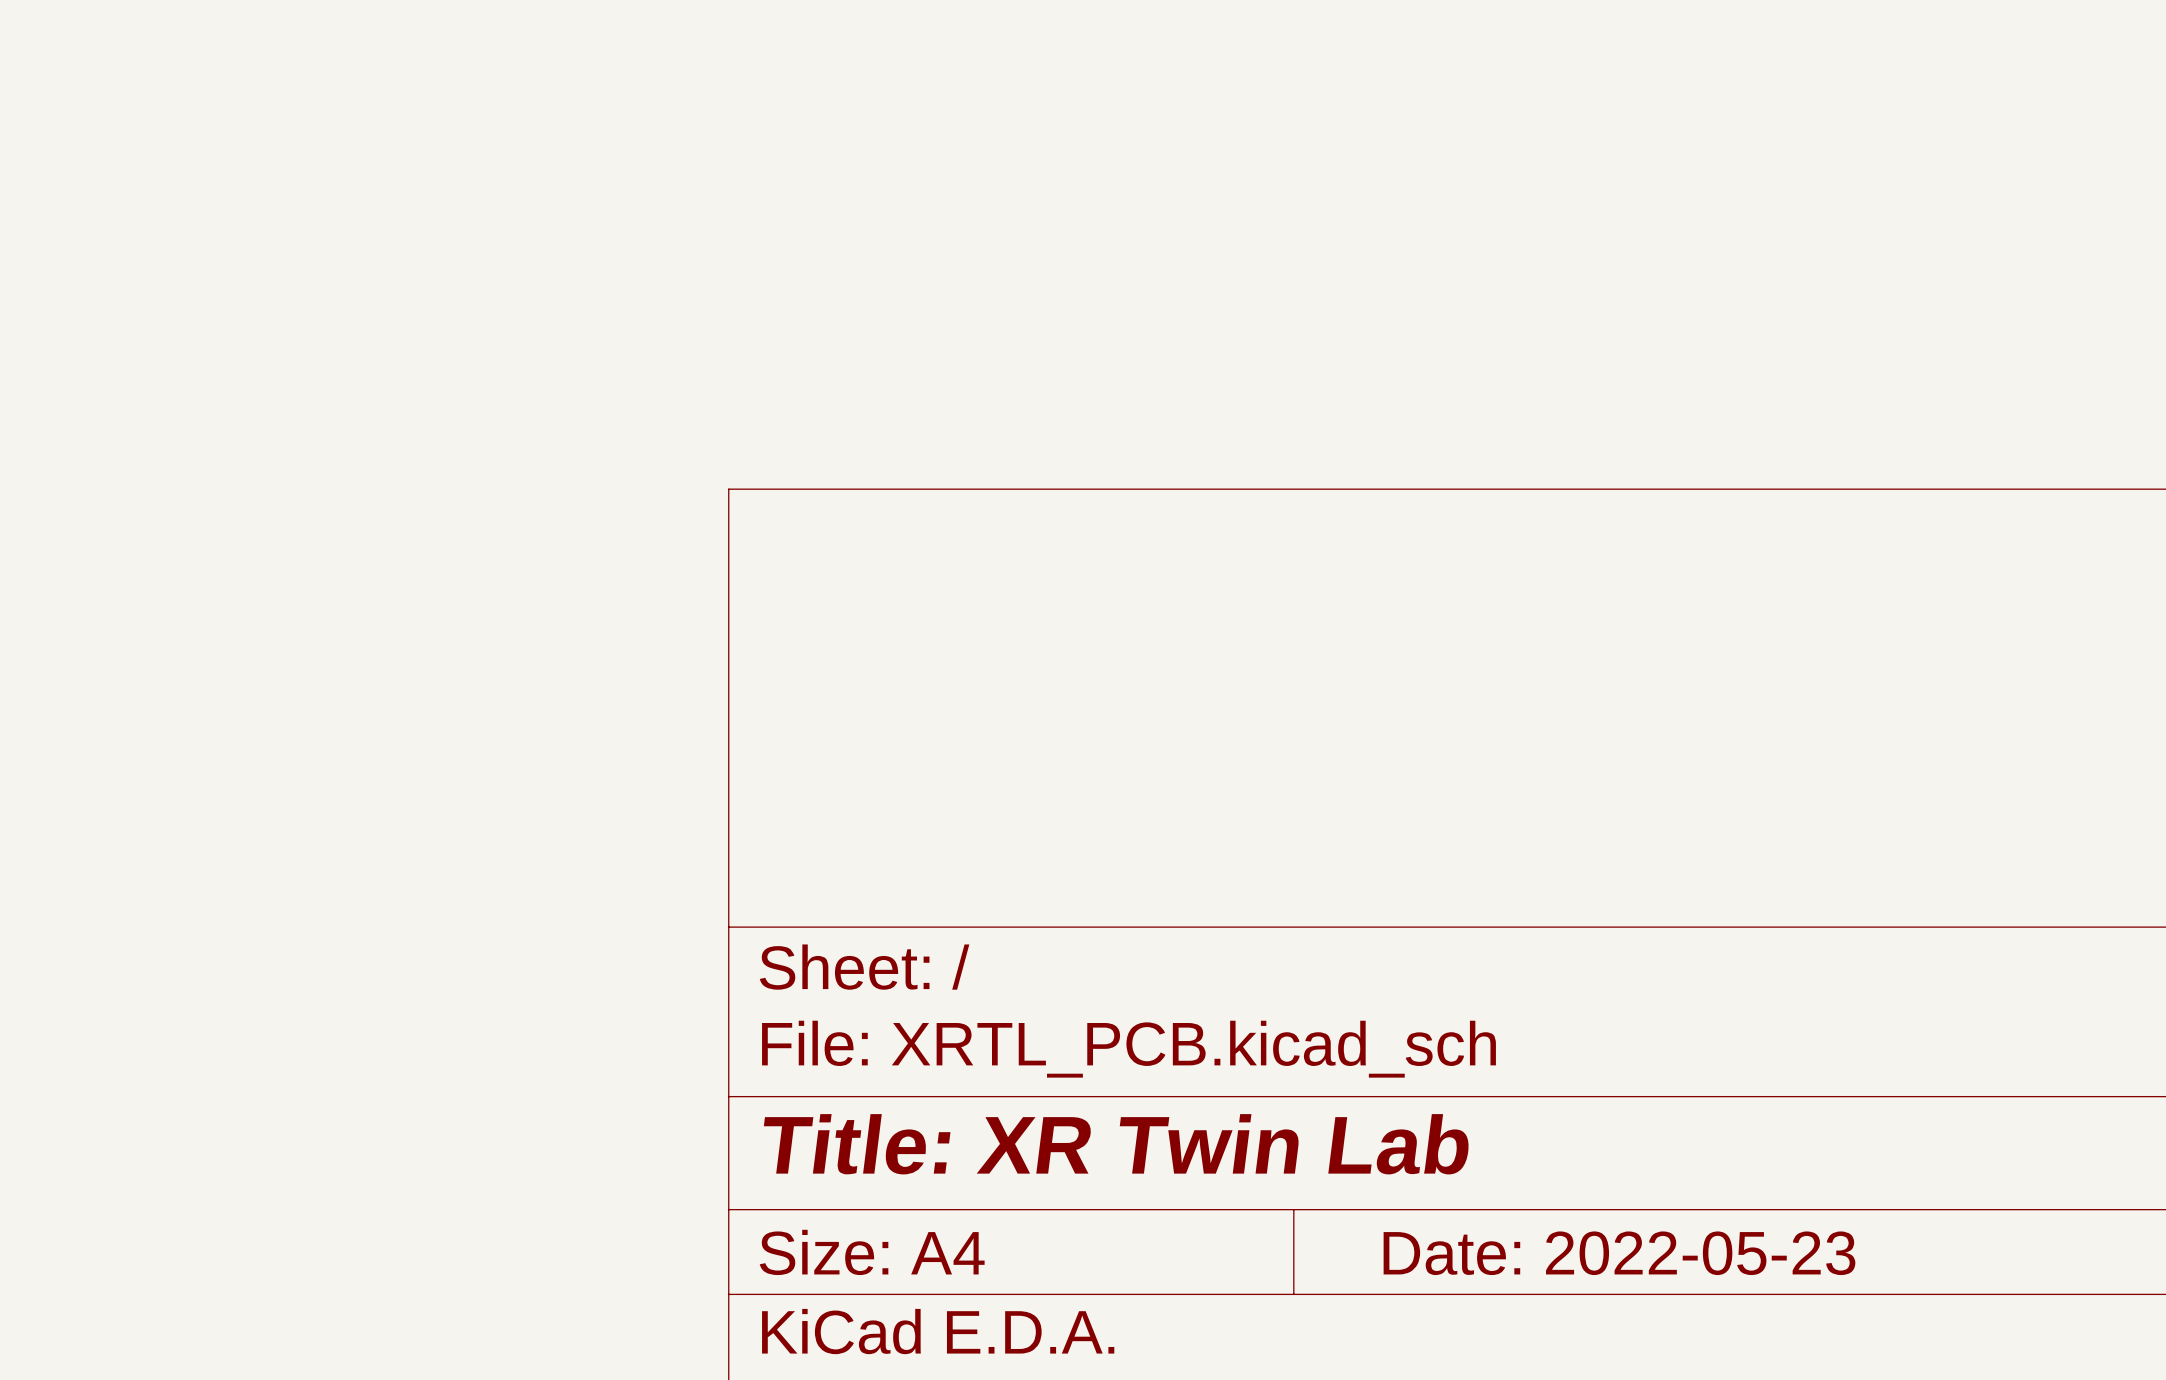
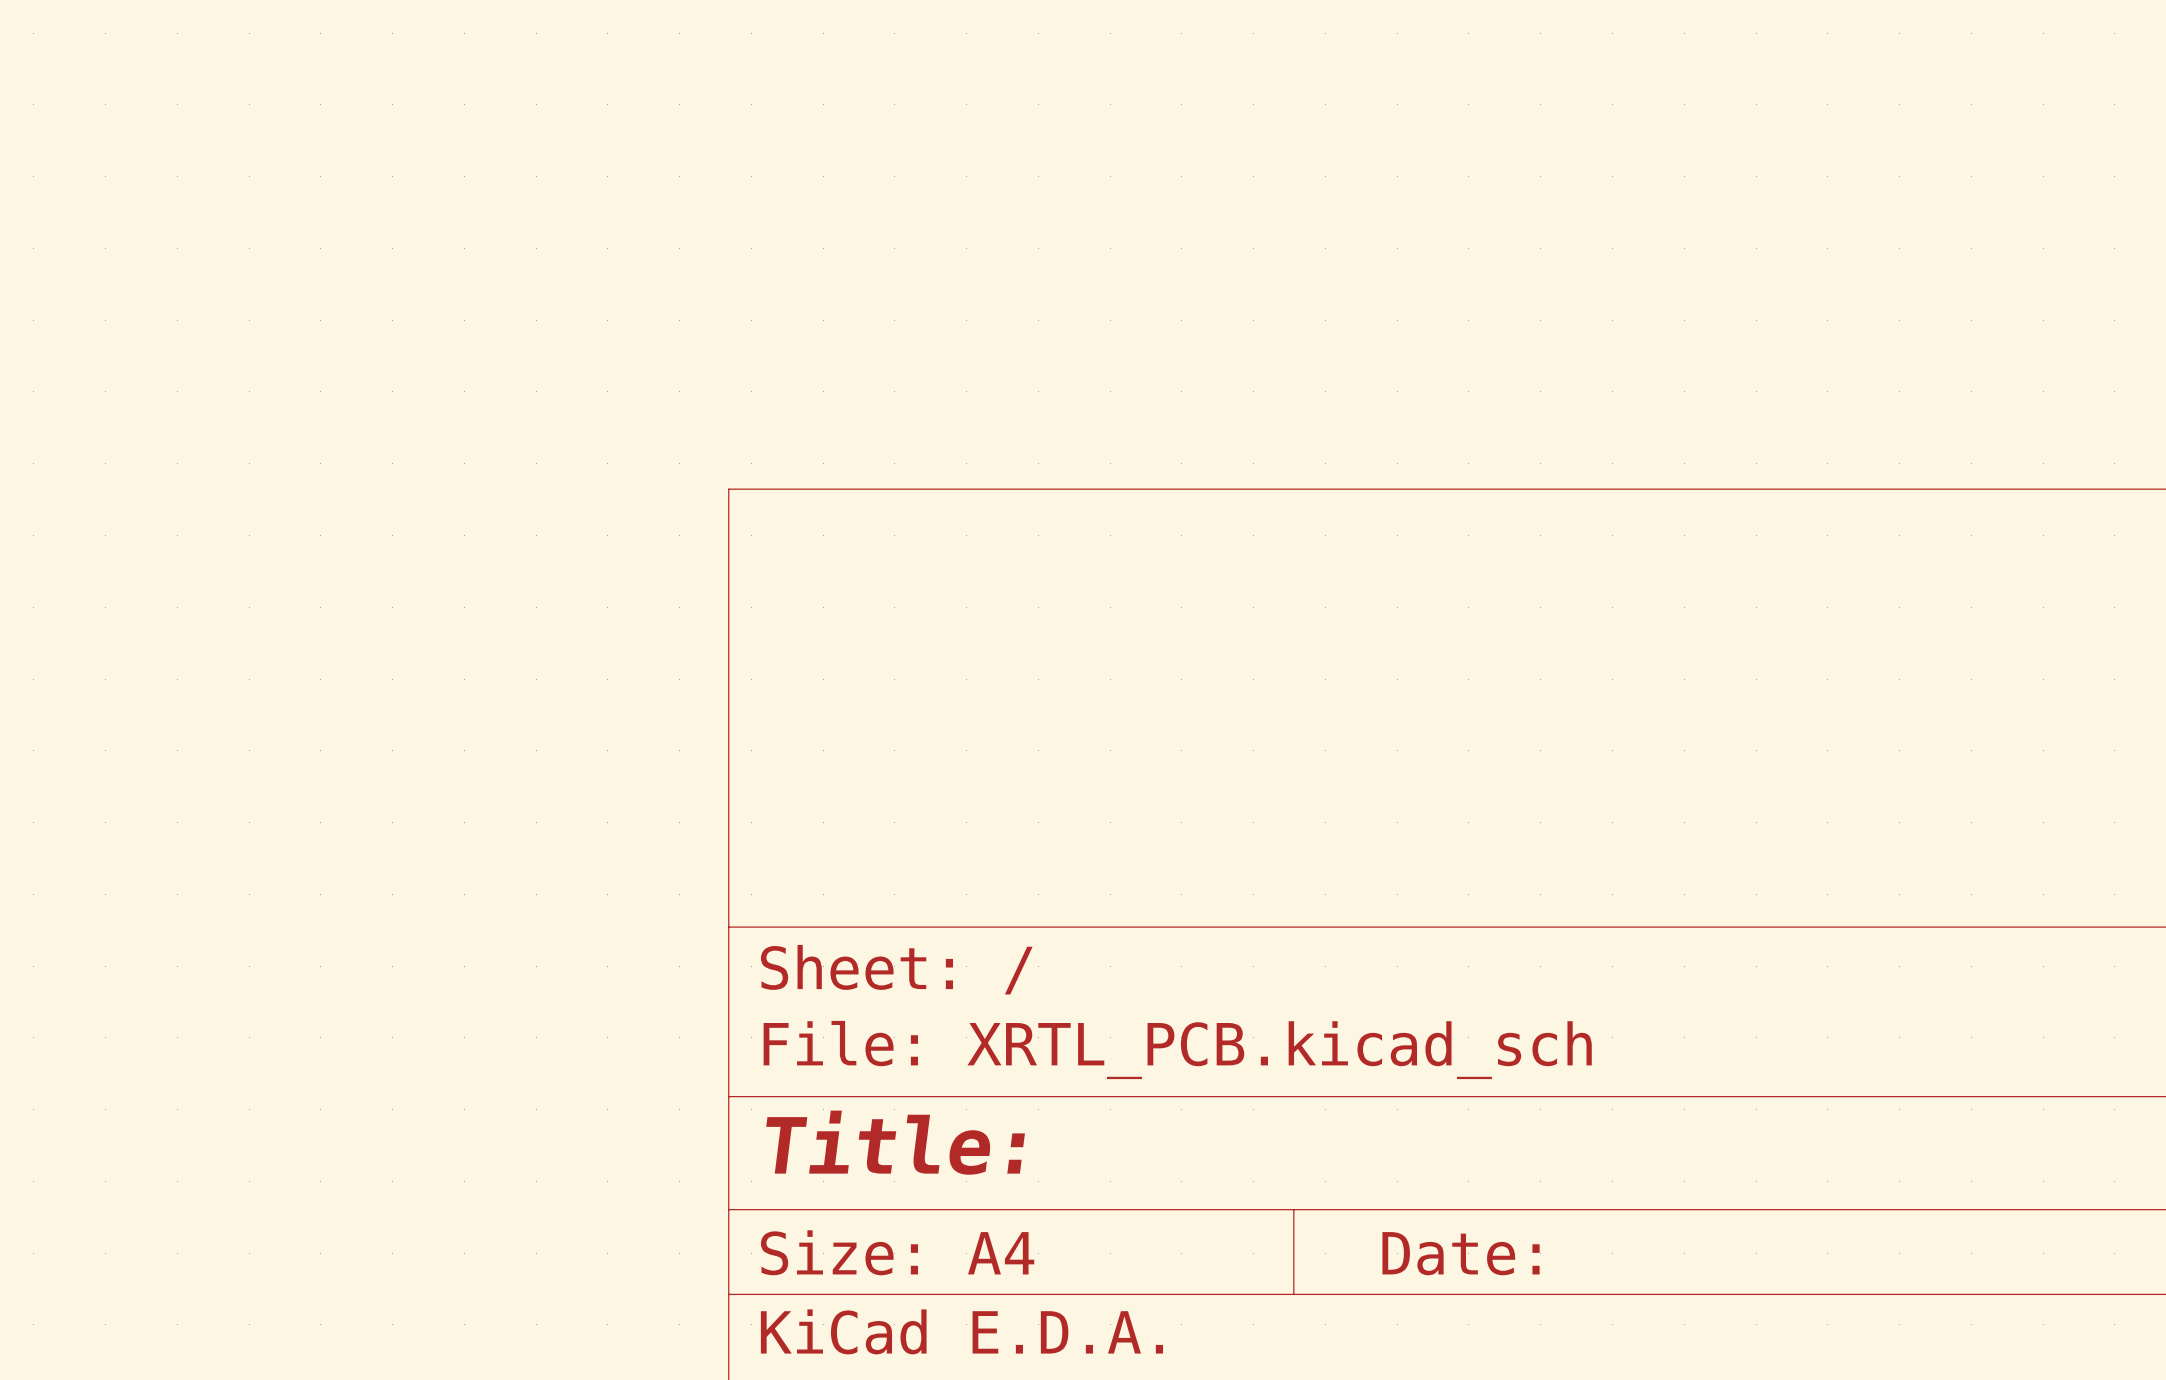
title block: Title: XR Twin Lab (1116, 1144) -> Title: (895, 1142)
title block: Date: 2022-05-23 (1619, 1253) -> Date: (1461, 1253)

